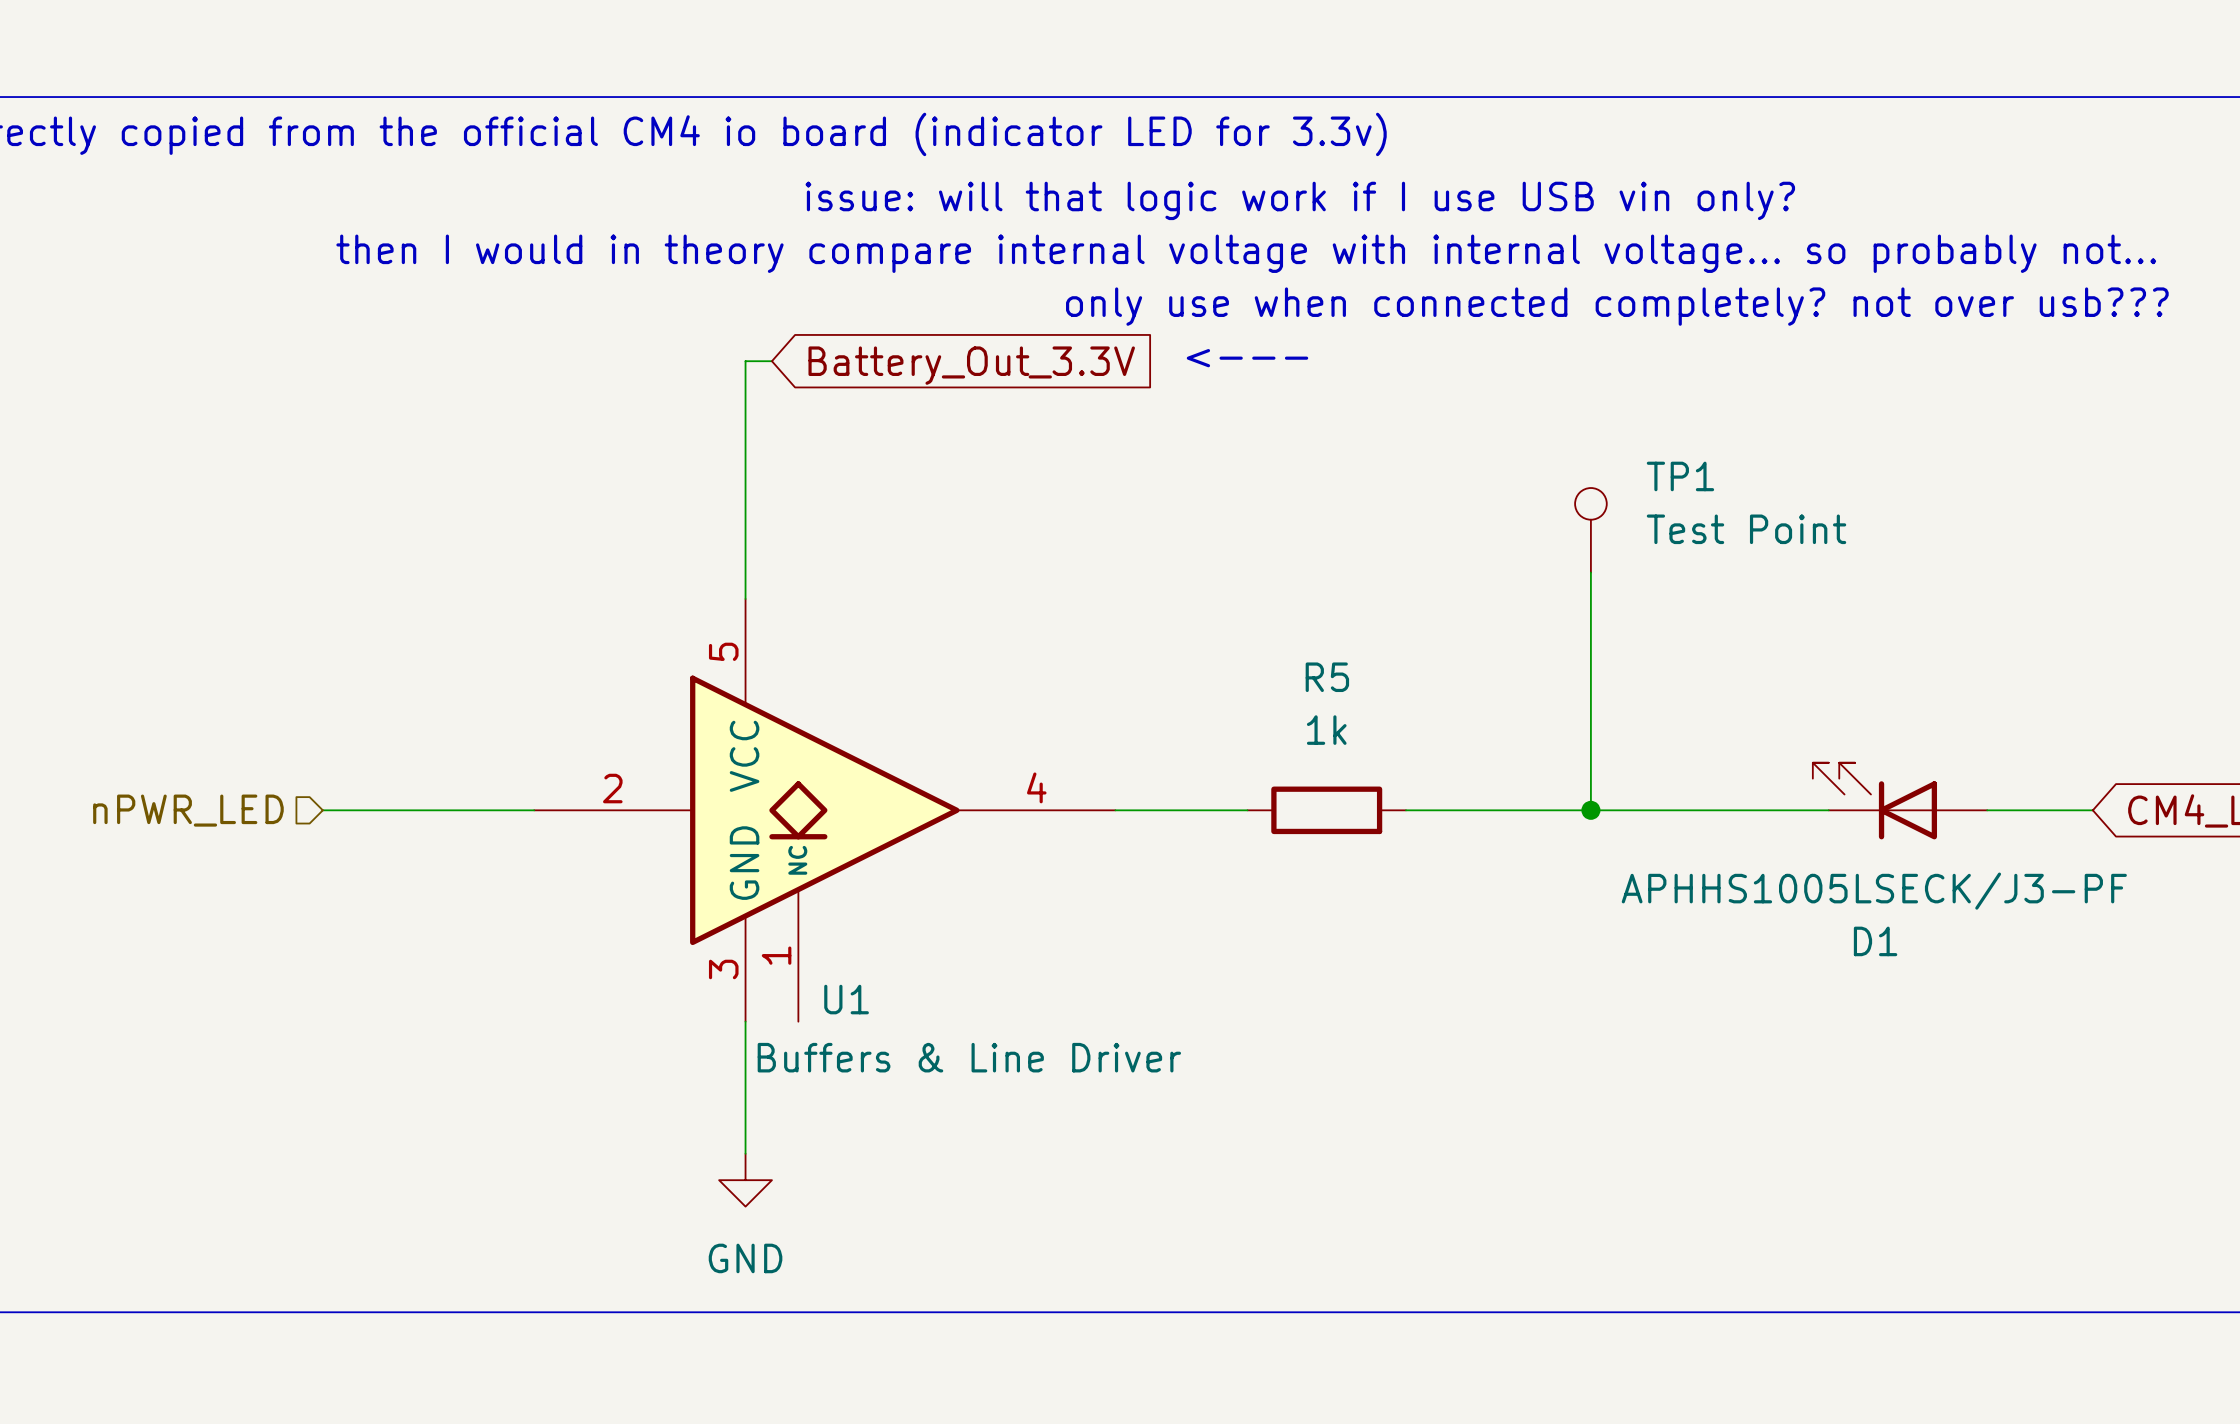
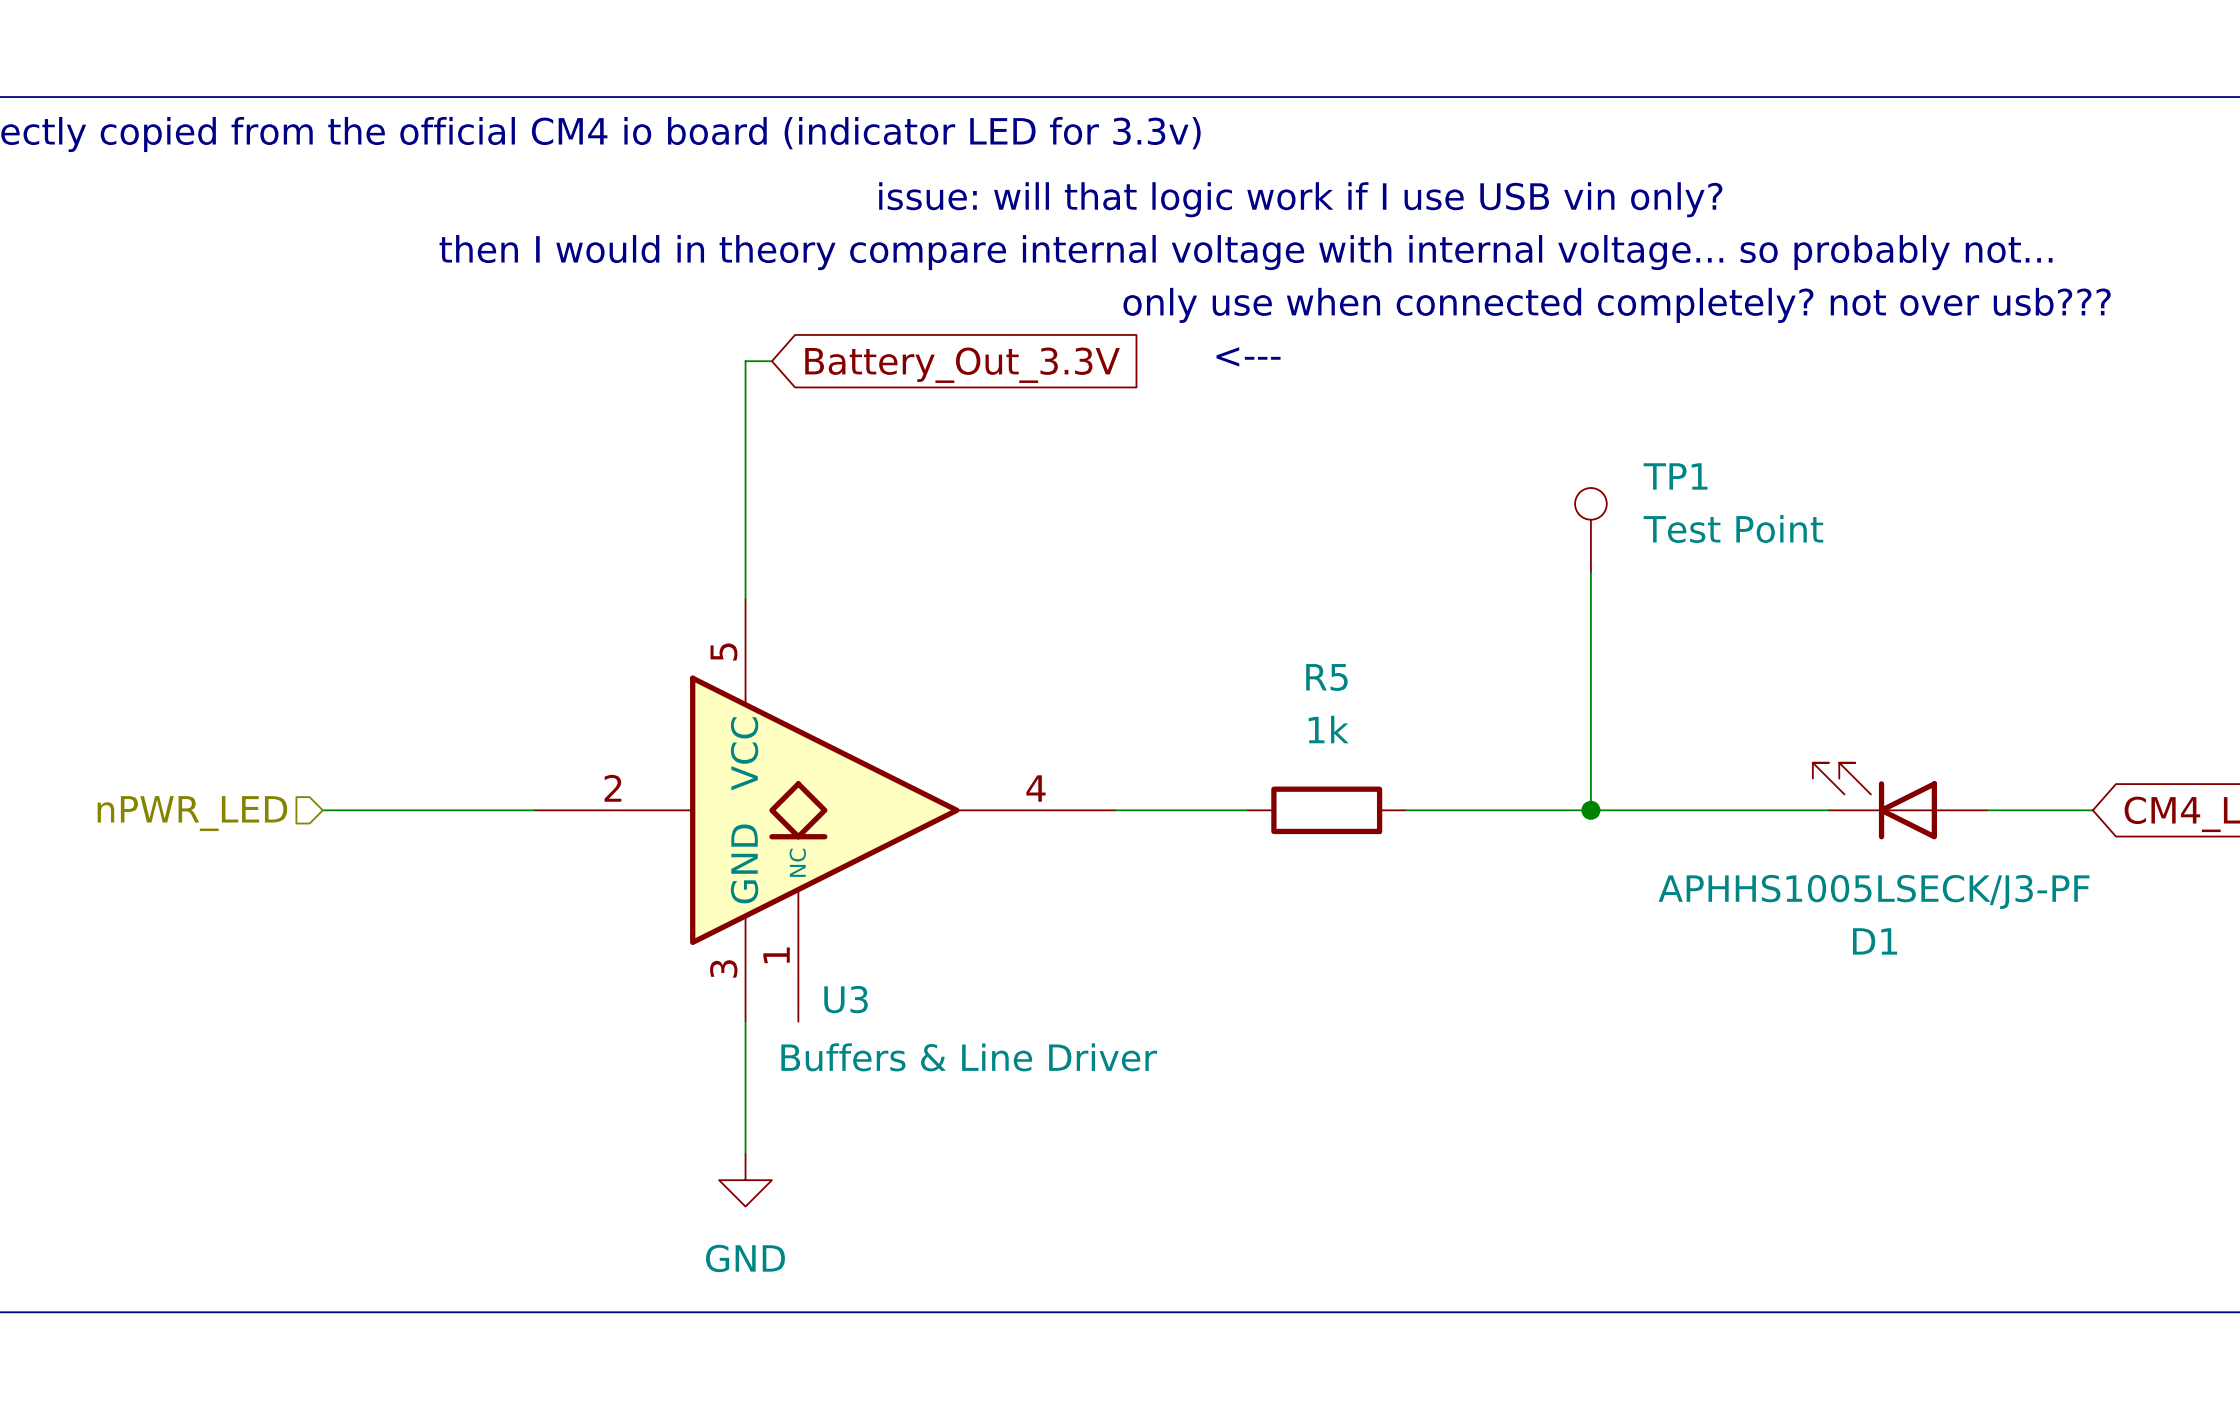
U1 name: U1 (846, 999) -> U3 (846, 999)

